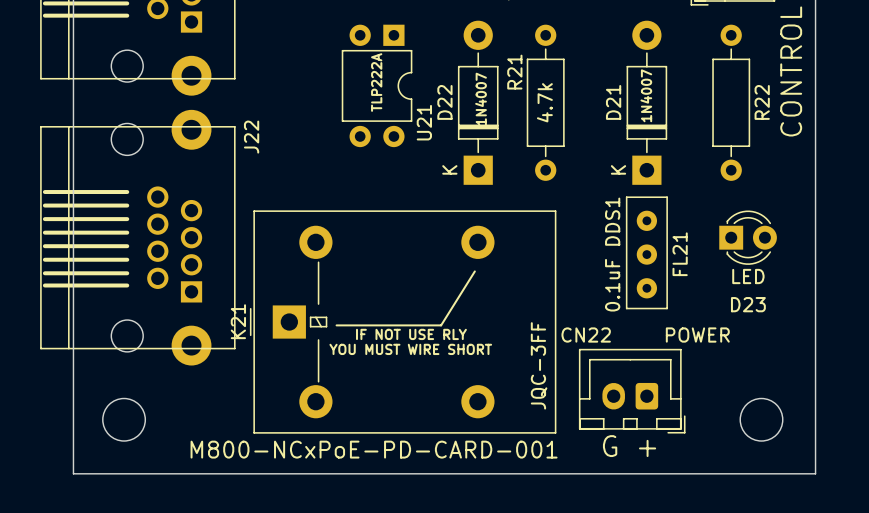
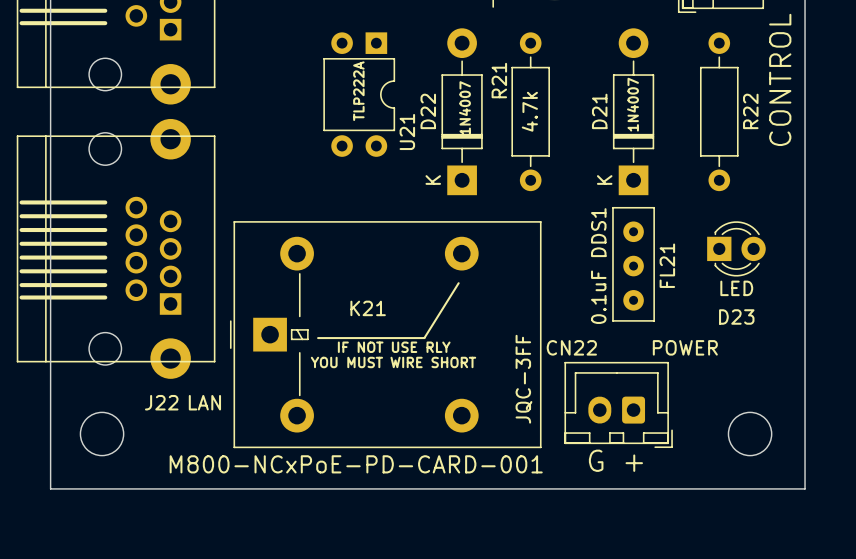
J22 name rotation: 0° (251, 137) -> 90° clockwise (161, 402)
J22 name position: J22 (251, 137) -> J22 (161, 402)
K21 name rotation: 0° (238, 321) -> 90° clockwise (368, 308)
K21 name position: K21 (238, 321) -> K21 (368, 308)
text: none -> LAN (204, 402)

